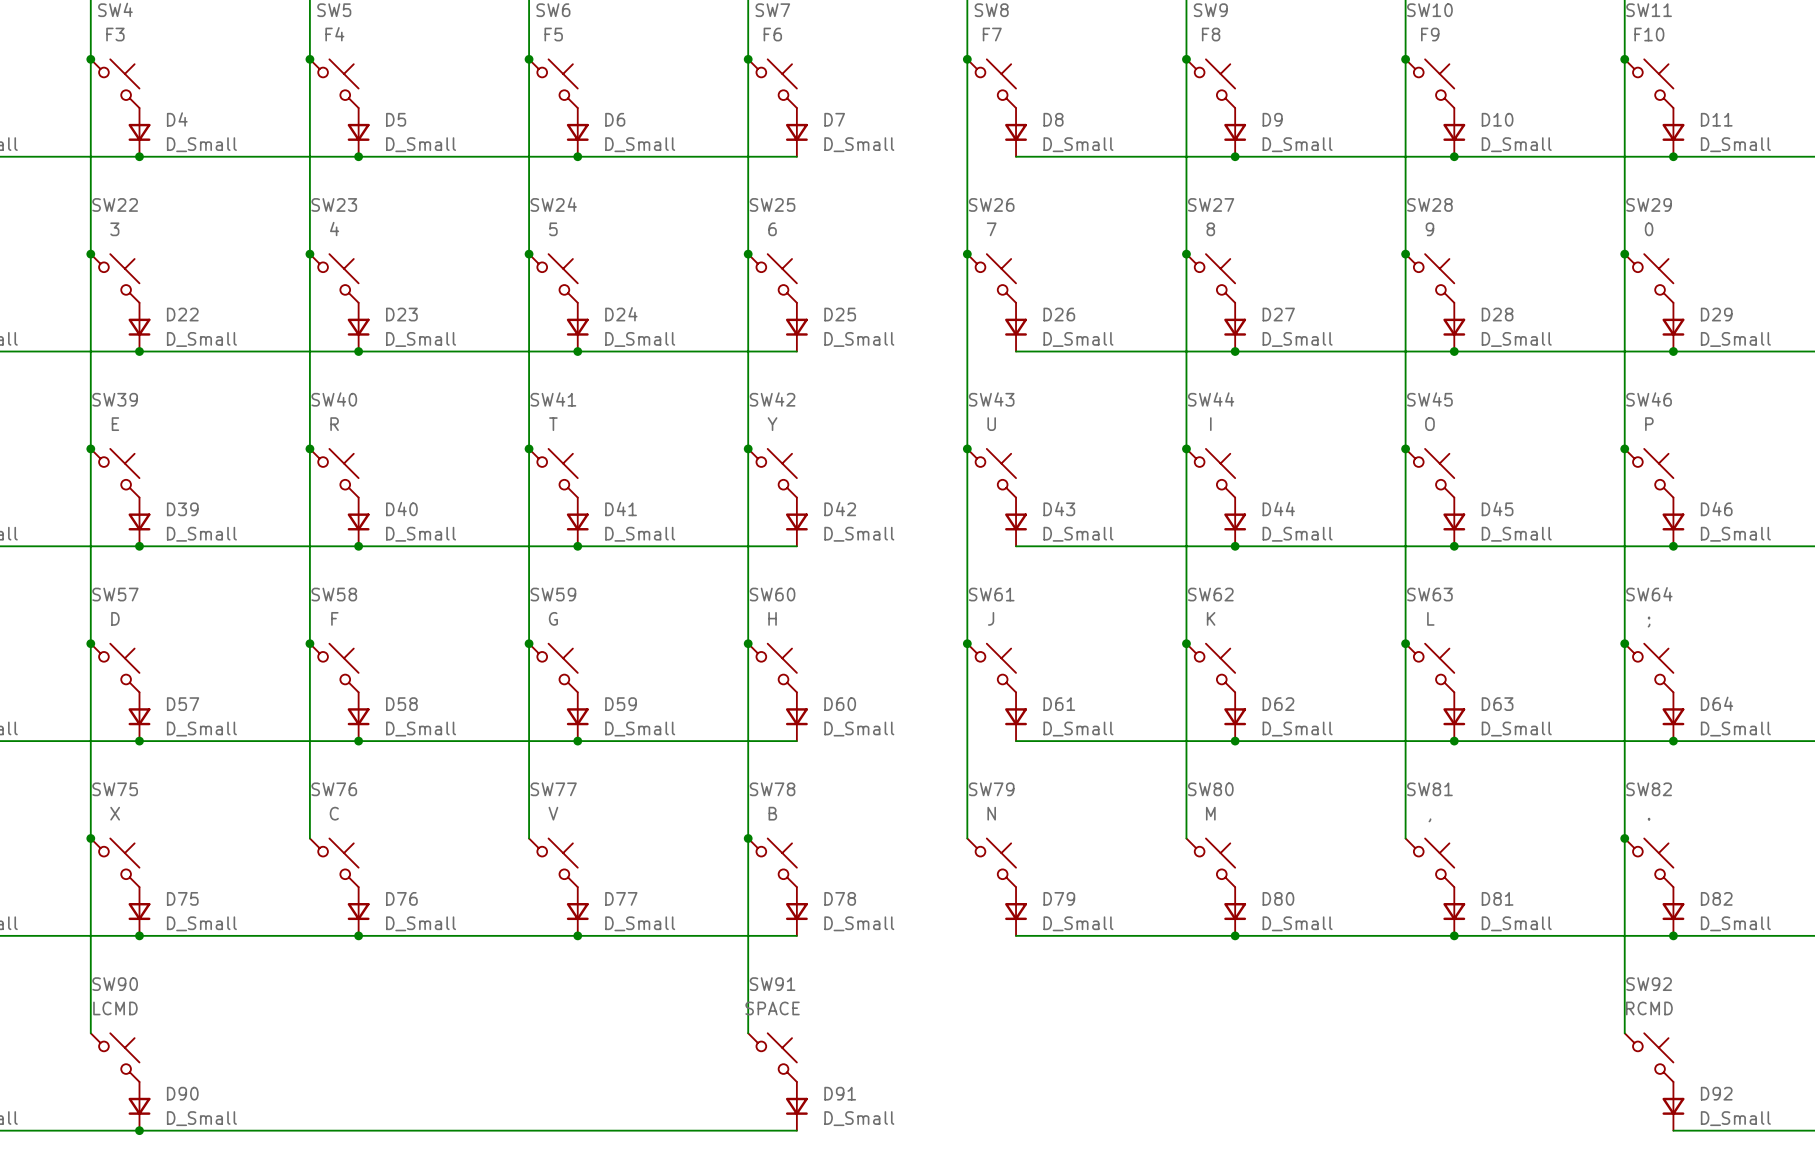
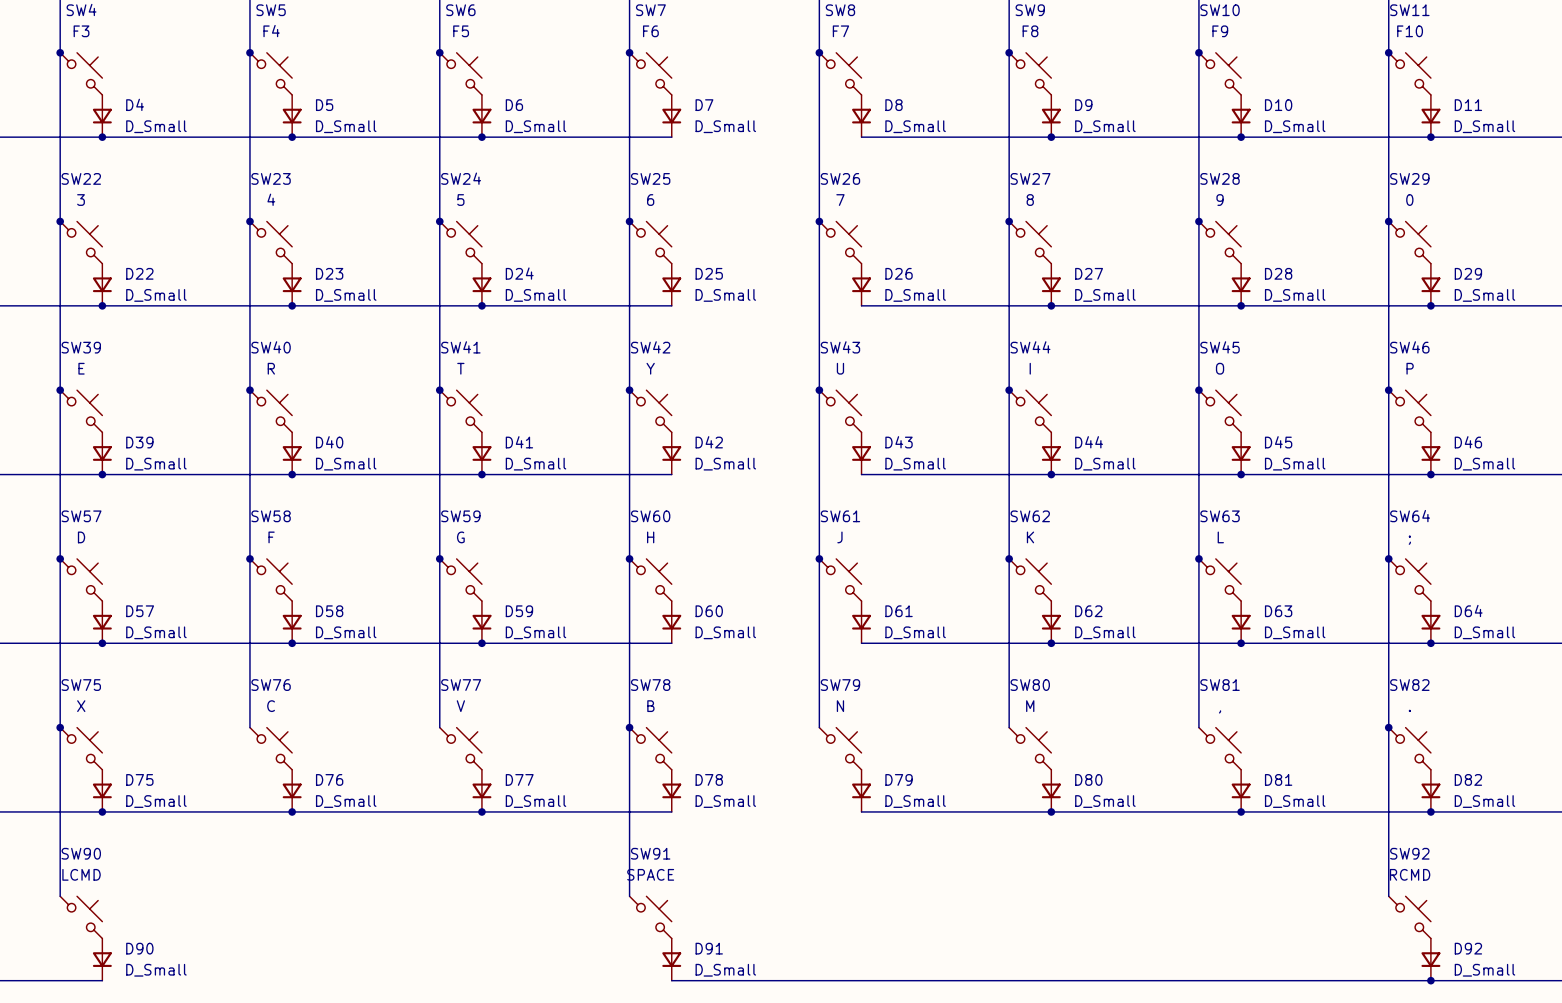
wire: (139, 1130) (796, 1130) -> (1430, 980) (671, 980)
junction: (139, 1130) -> none
junction: none -> (1430, 980)

